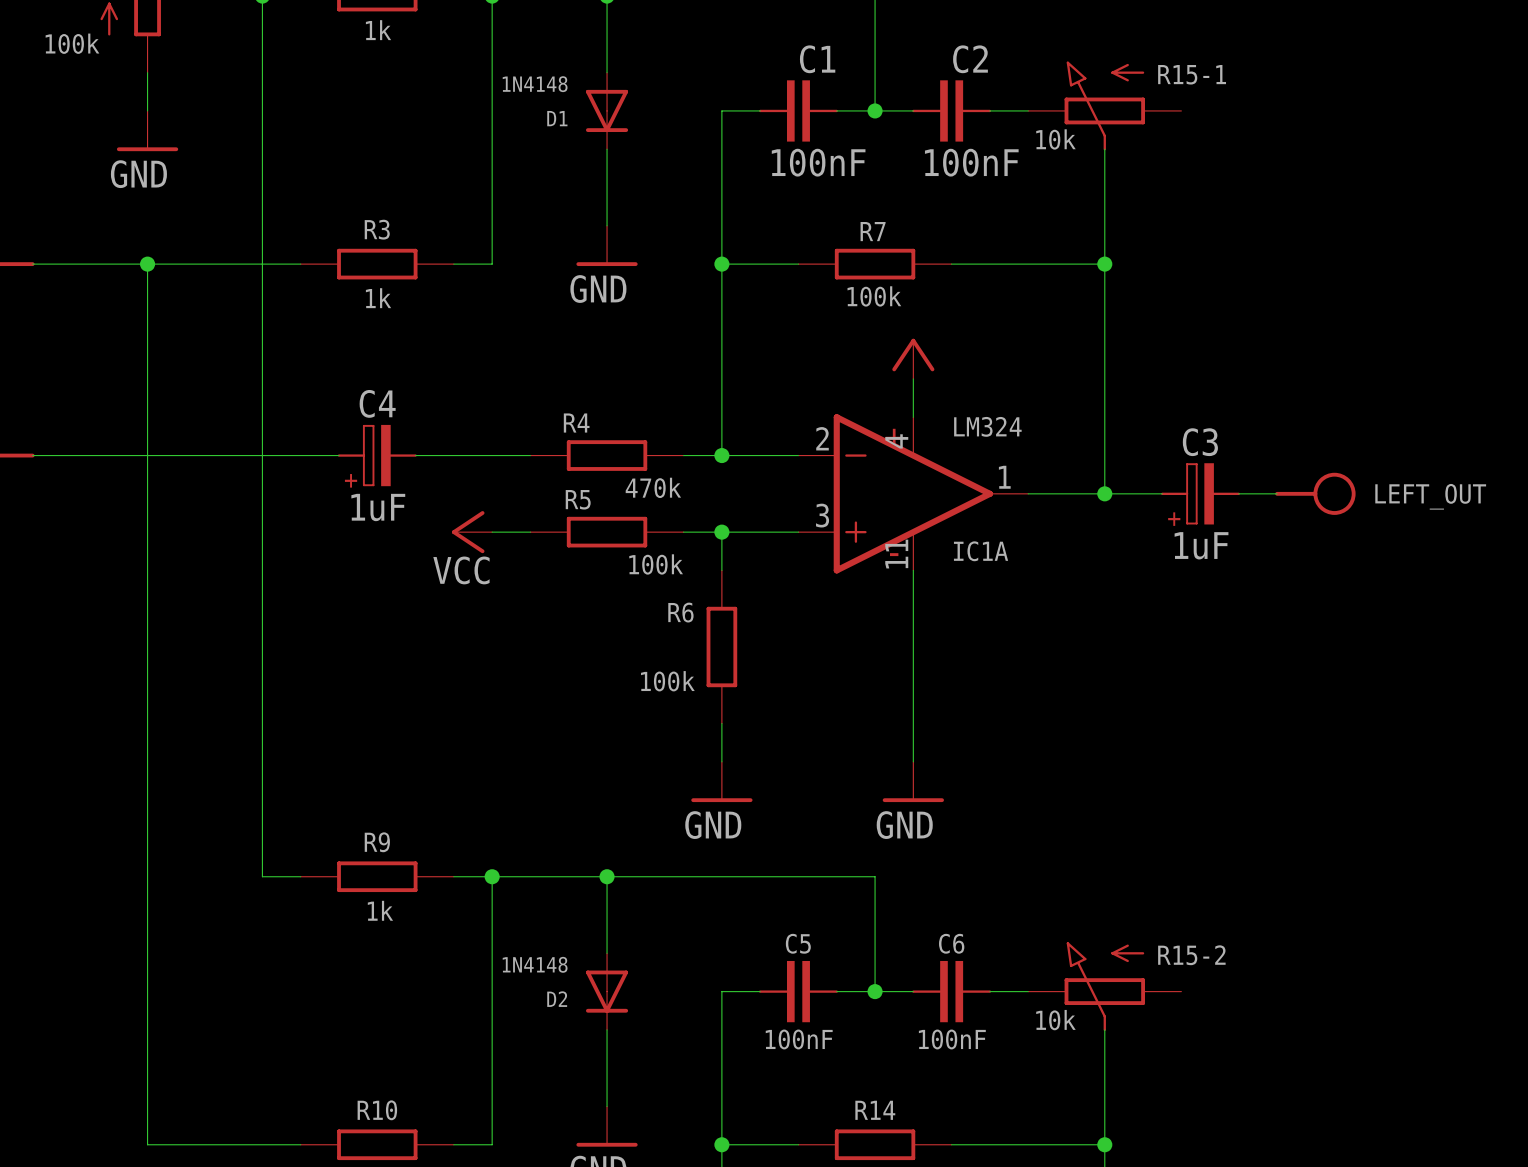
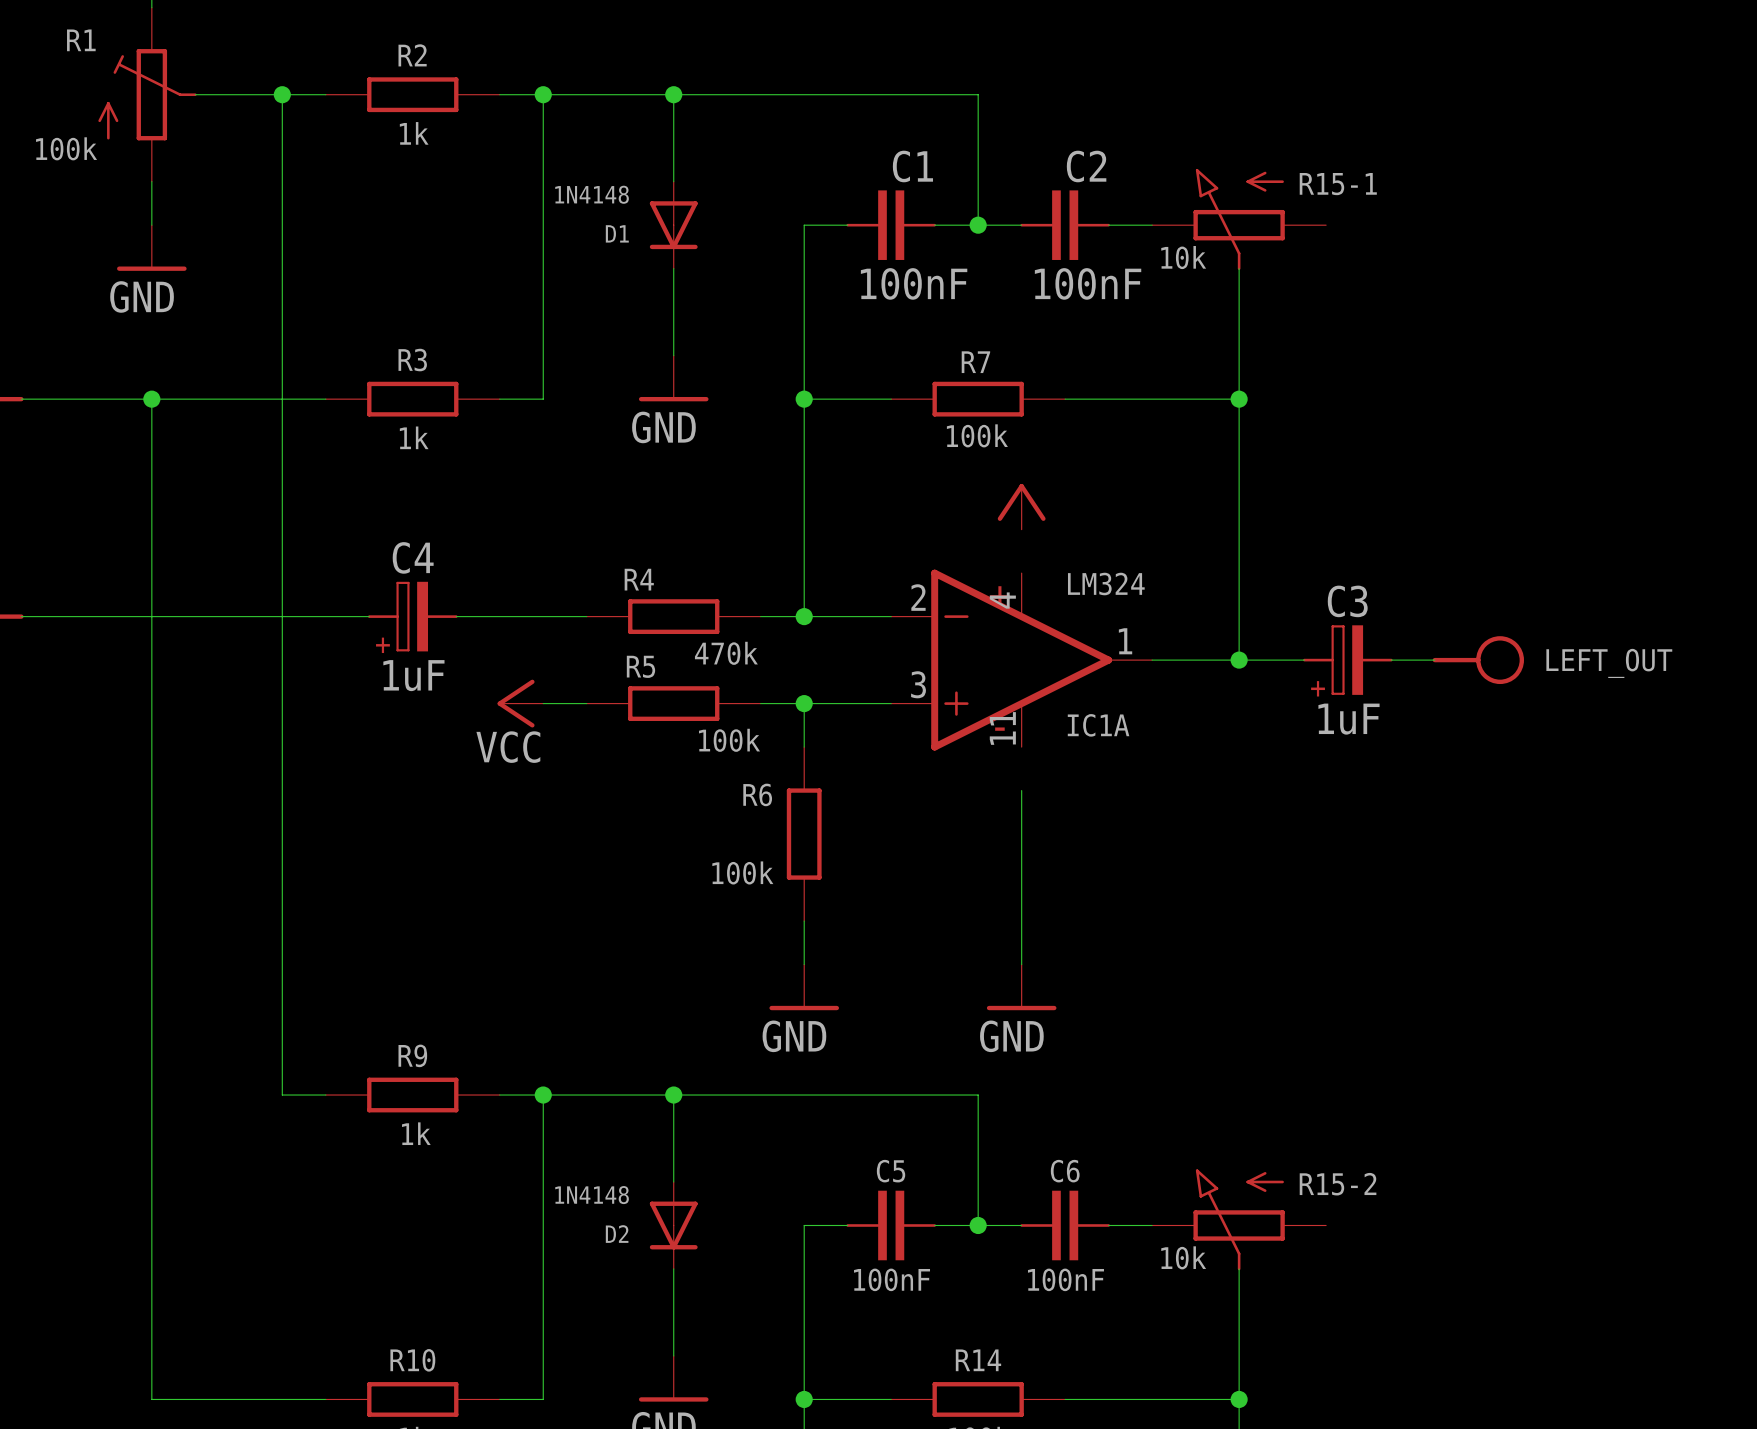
wire: (913, 378) (913, 417) -> none
wire: (913, 570) (913, 608) -> none

